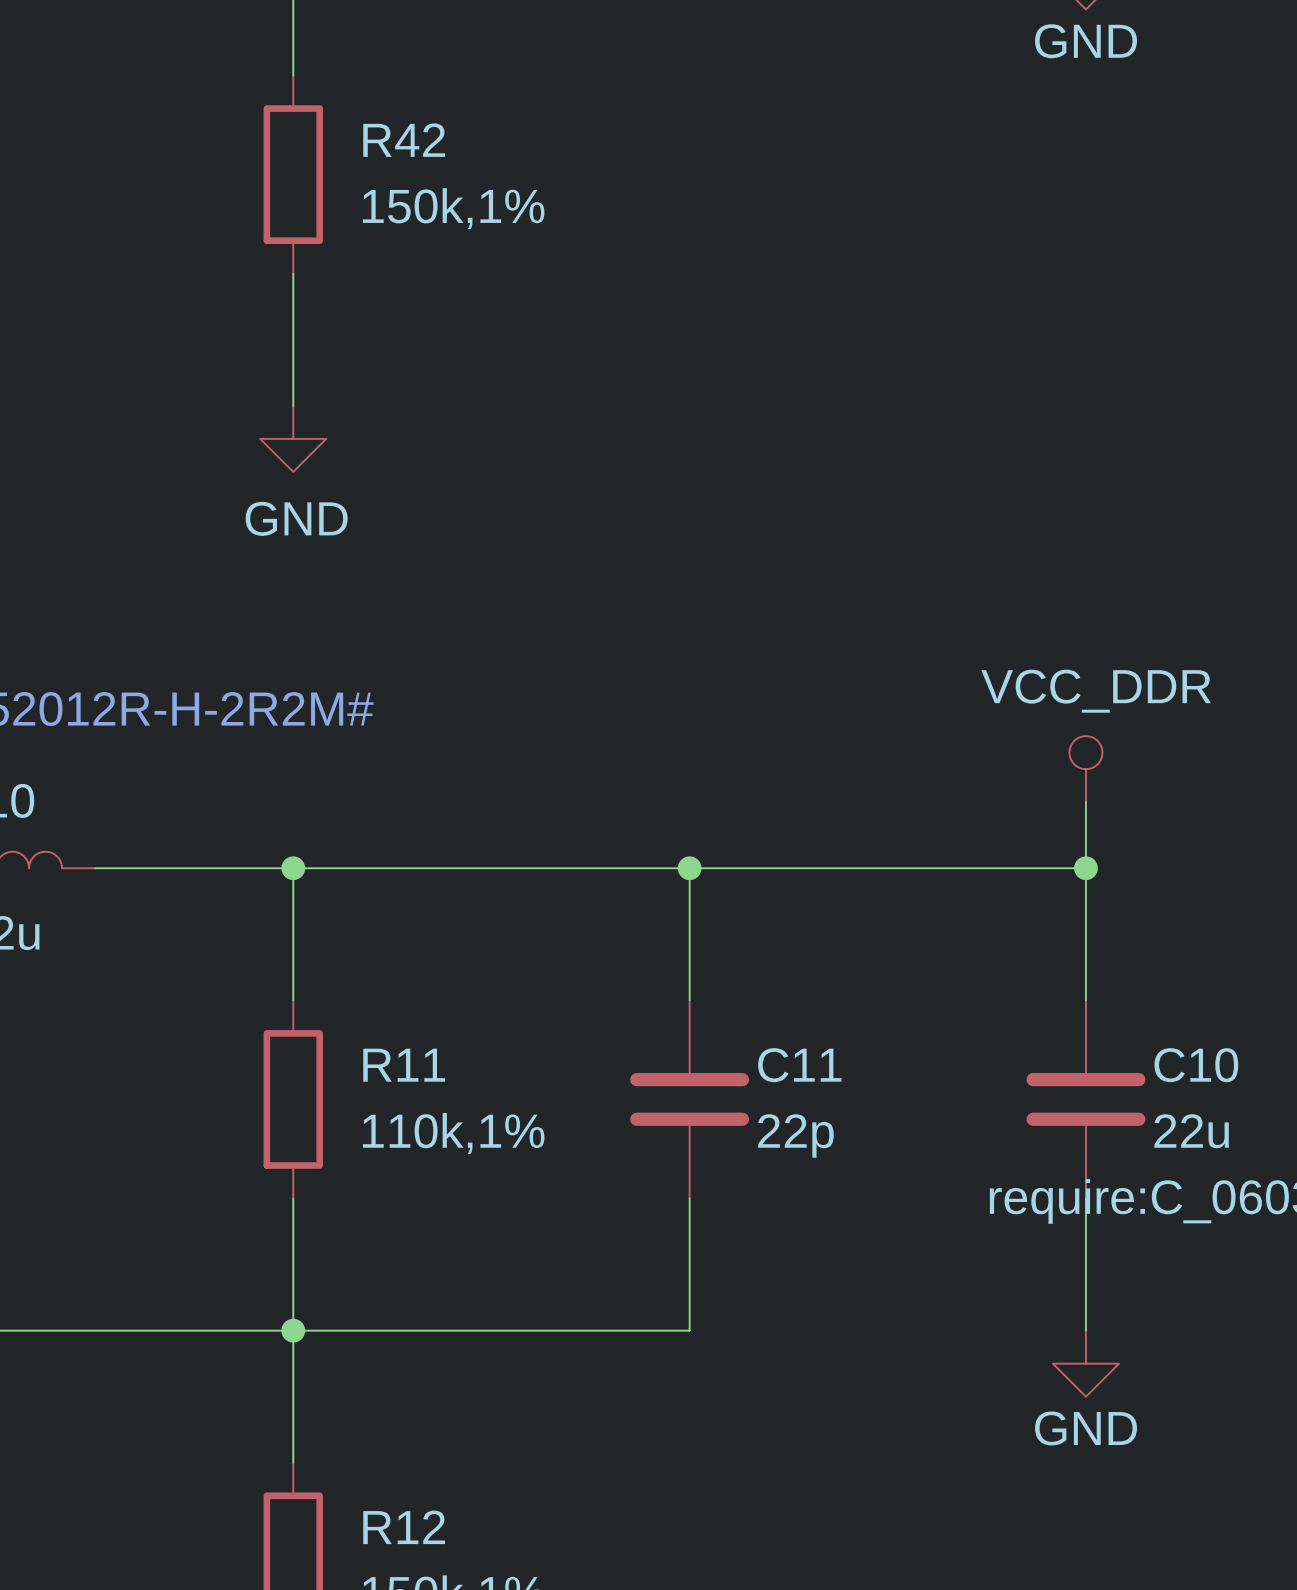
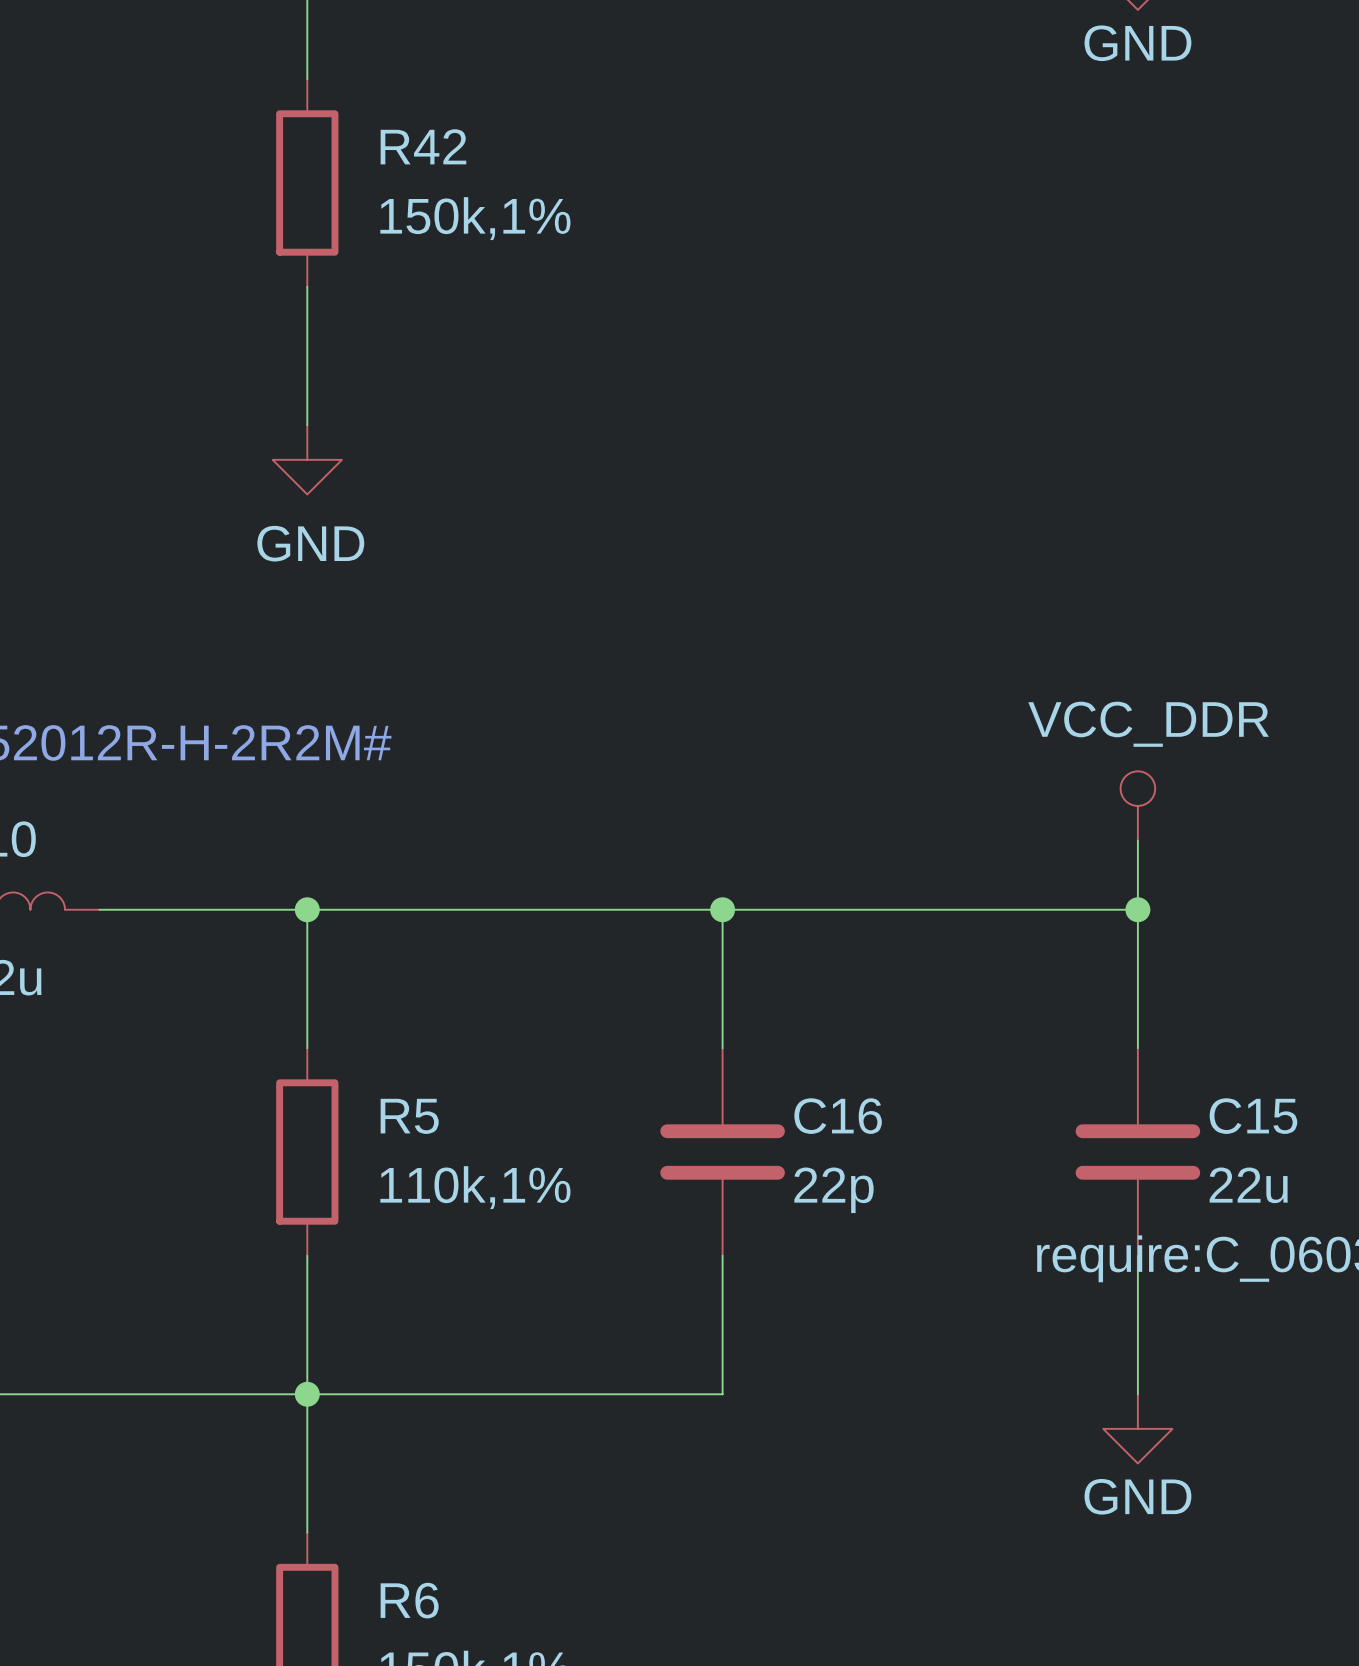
R11 name: R11 (404, 1065) -> R5 (409, 1116)
C11 name: C11 (799, 1065) -> C16 (838, 1116)
C10 name: C10 (1196, 1065) -> C15 (1253, 1116)
R12 name: R12 (404, 1527) -> R6 (409, 1600)

